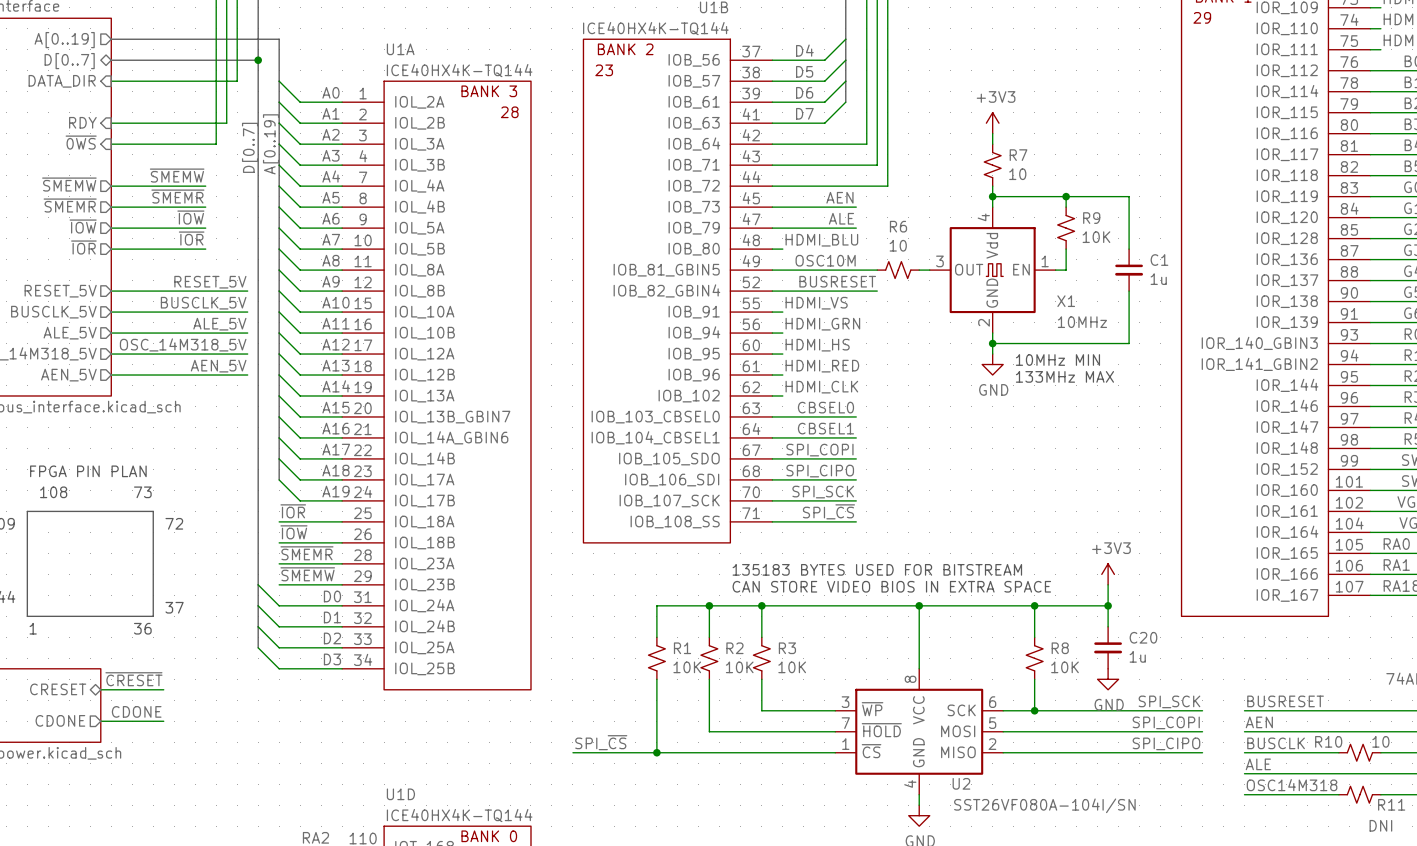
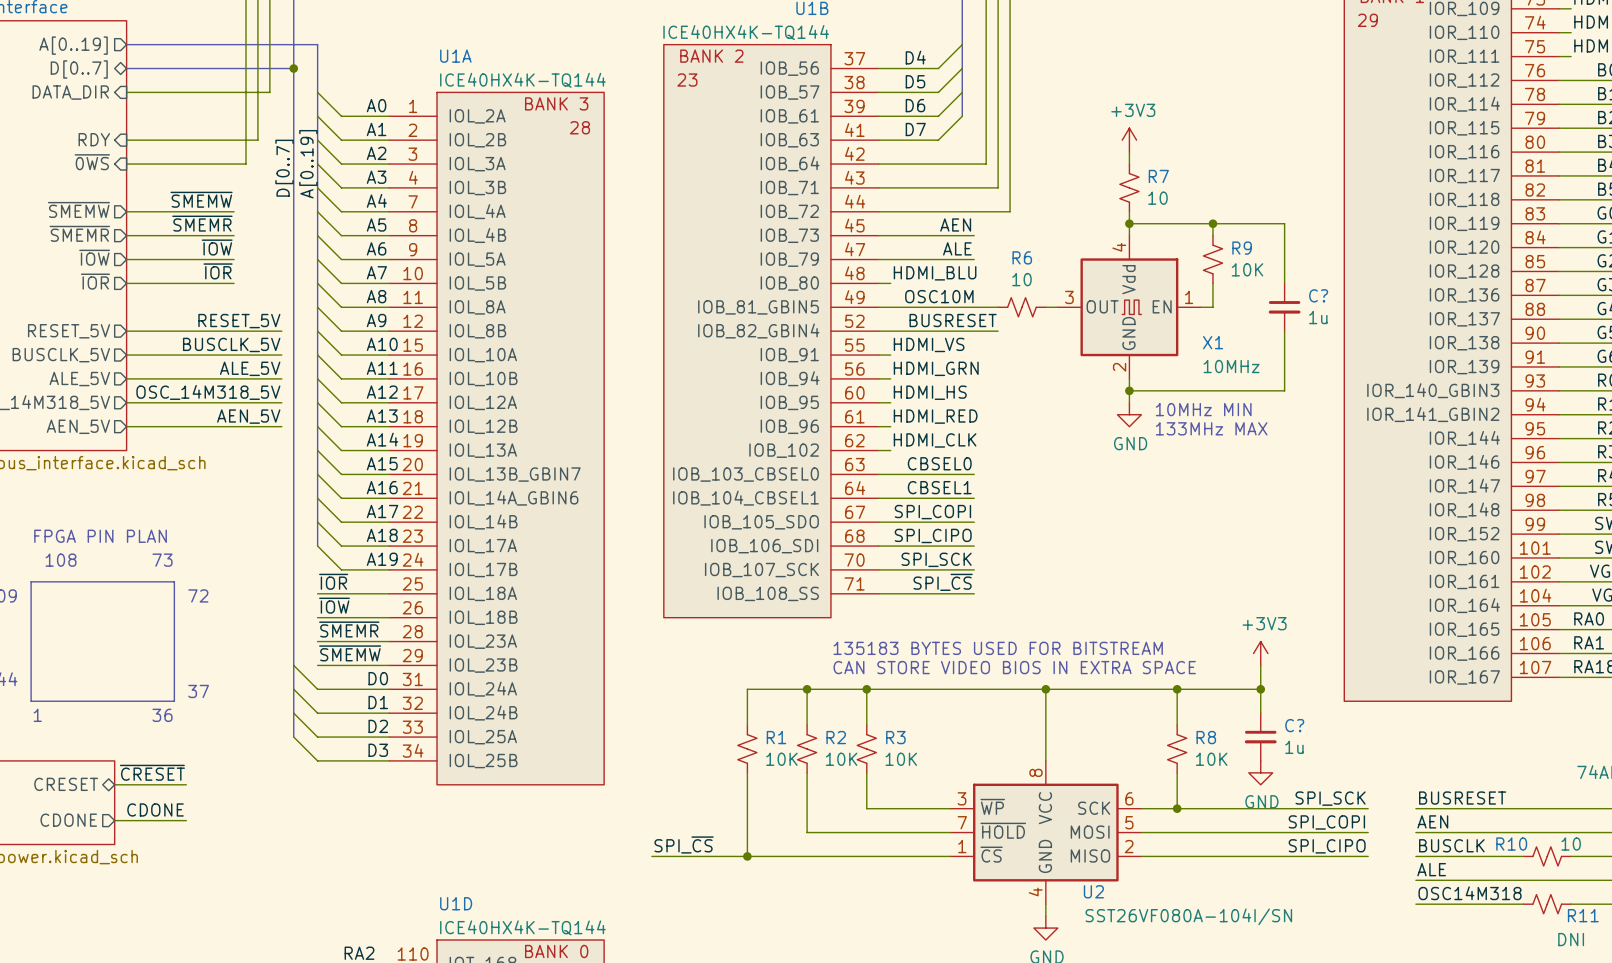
C1 name: C1 (1159, 260) -> C? (1318, 295)
C20 name: C20 (1143, 637) -> C? (1294, 725)

